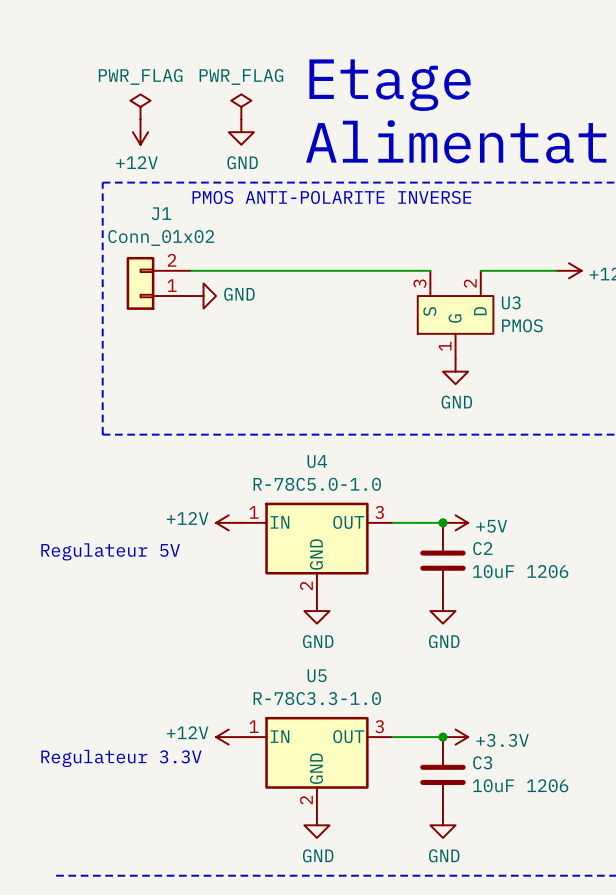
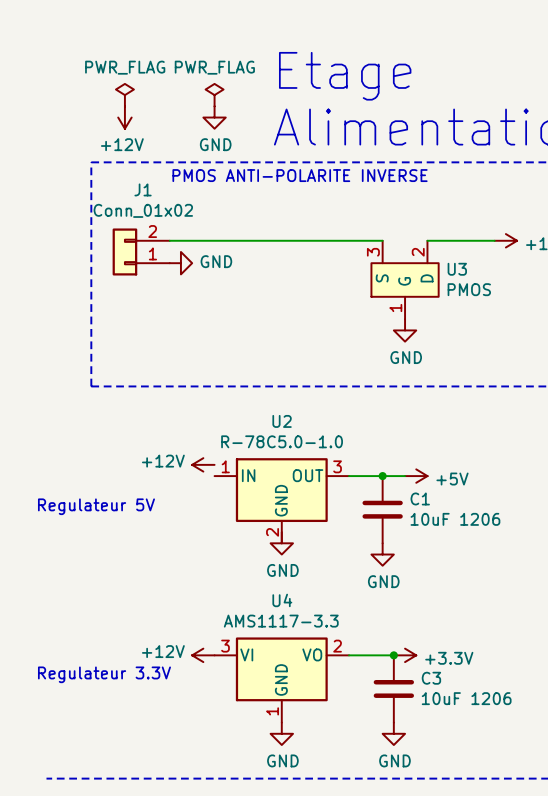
U4 value: R-78C5.0-1.0 (317, 484) -> AMS1117-3.3 (281, 621)
U4 pin number: 1 (253, 512) -> 3 (225, 646)
U4 pin number: 3 (379, 512) -> 2 (337, 646)
U4 pin name: IN (279, 522) -> VI (246, 654)
U4 pin name: OUT (348, 522) -> VO (312, 654)
wire: (392, 522) (442, 522) -> none
junction position: (442, 522) -> (382, 476)
power symbol position: +5V (455, 522) -> +5V (416, 476)
wire: none -> (349, 476) (405, 476)
U4 position: (316, 550) -> (281, 680)
text position: Regulateur 5V (110, 551) -> Regulateur 5V (96, 506)
C2: 10uF 1206 (442, 560) -> none
U2: none -> R-78C5.0-1.0 (281, 500)
C1: none -> 10uF 1206 (382, 509)
U4 pin number: 2 (306, 585) -> 1 (272, 711)
power symbol position: GND (442, 611) -> GND (382, 554)
U5: R-78C3.3-1.0 (316, 764) -> none

